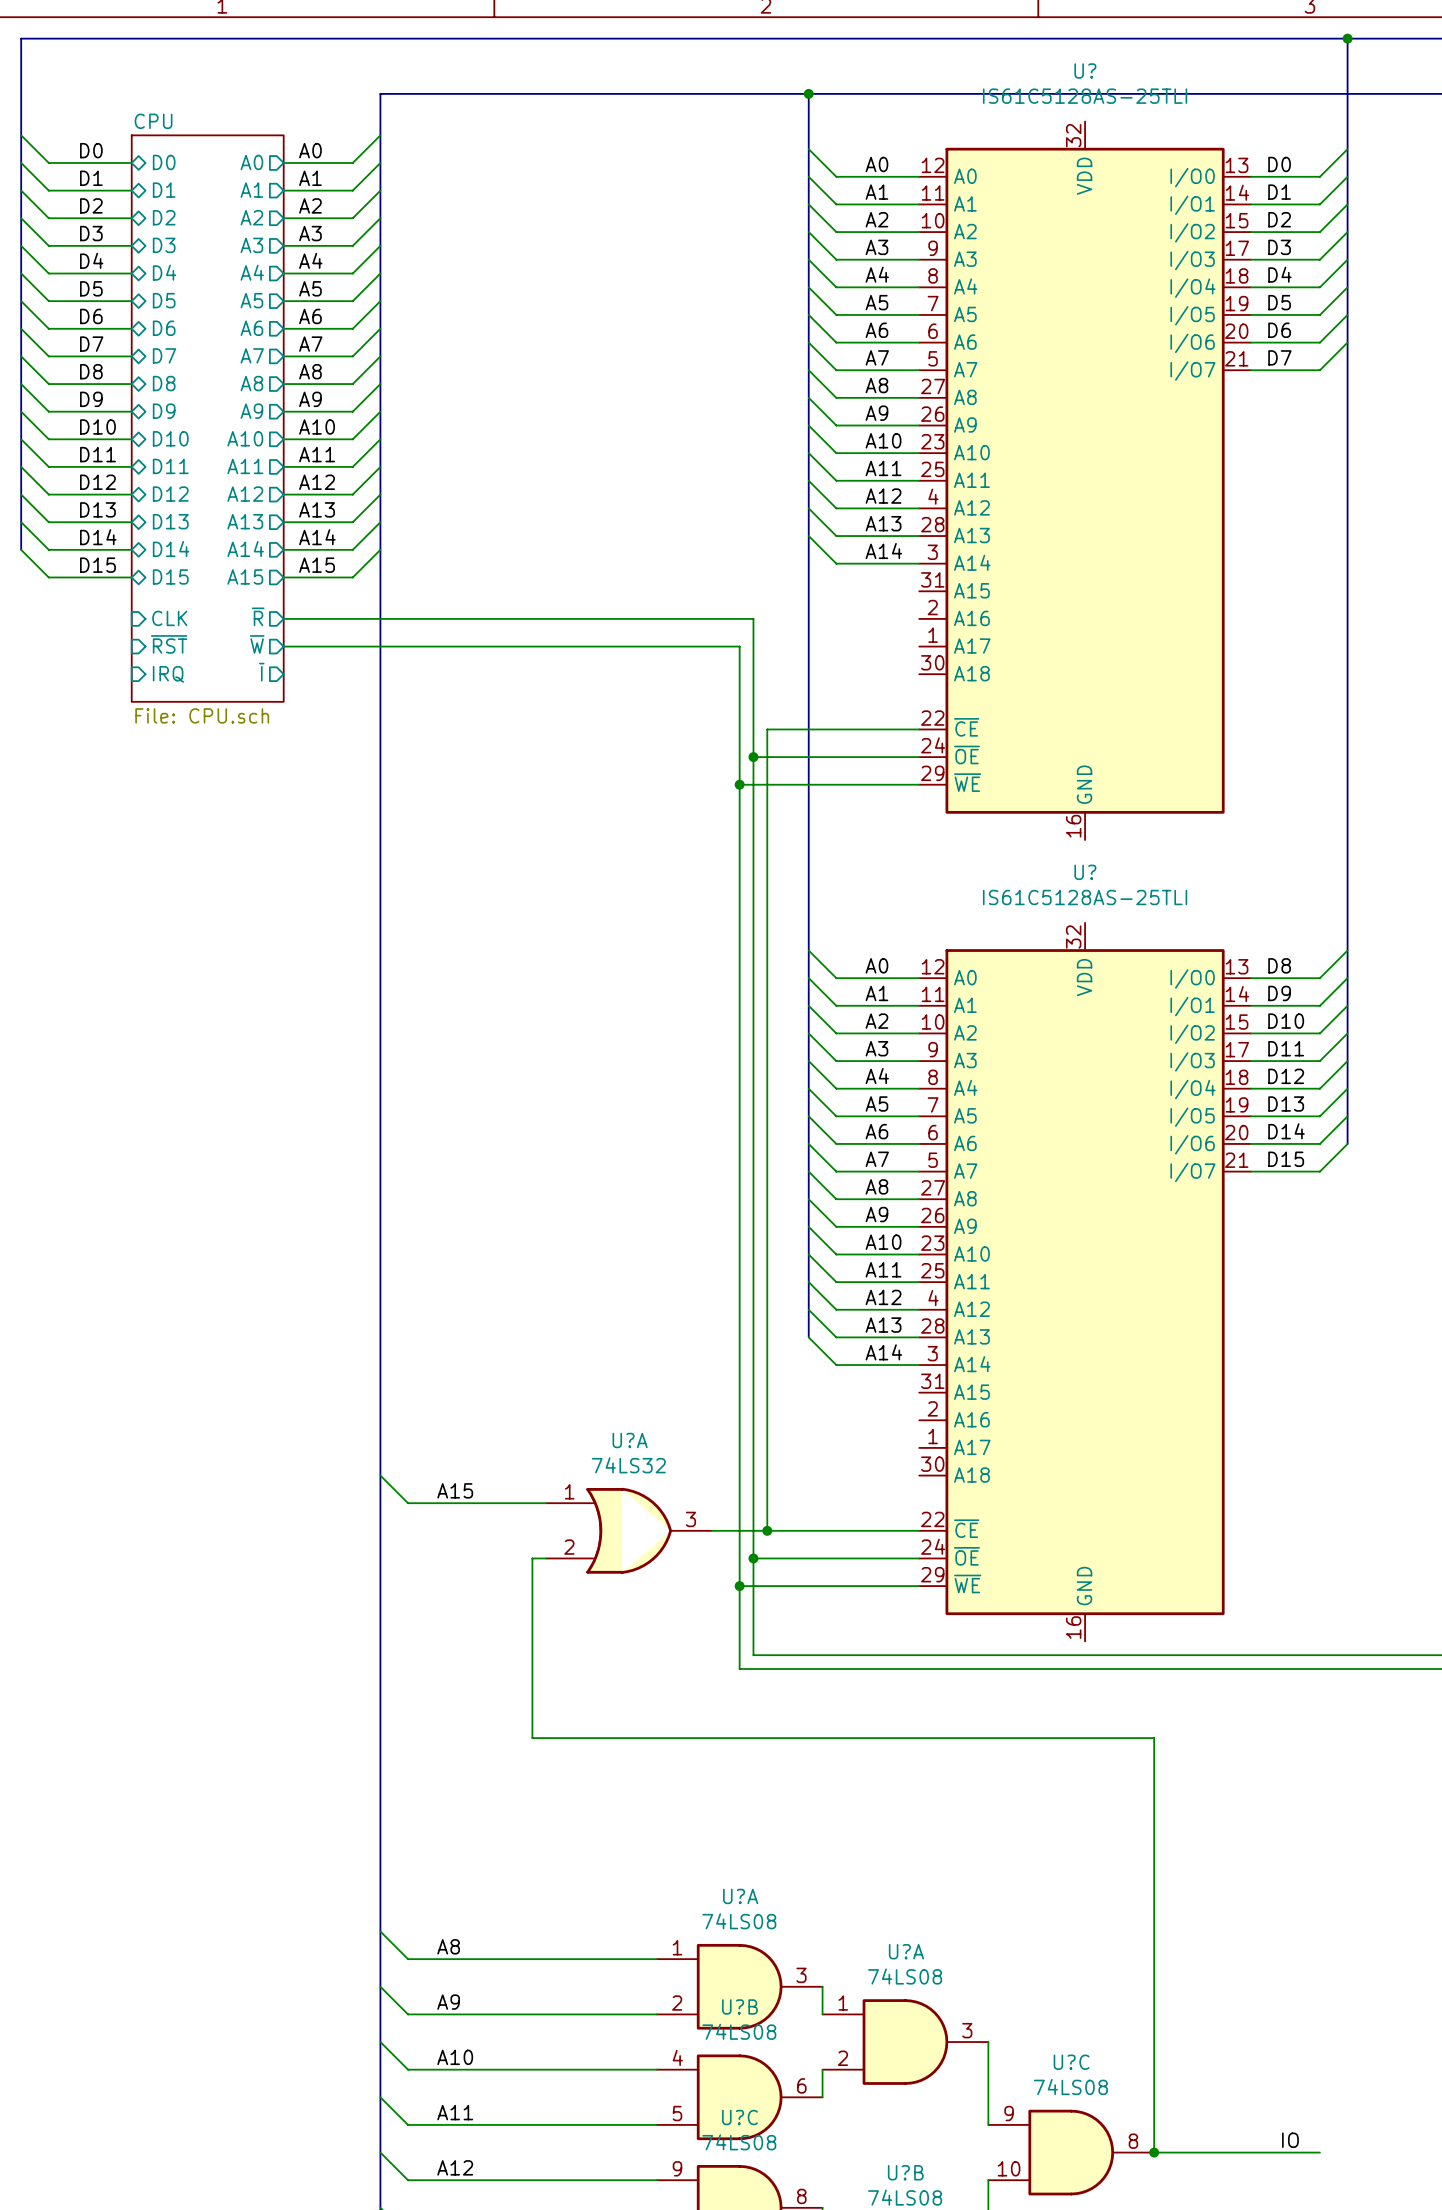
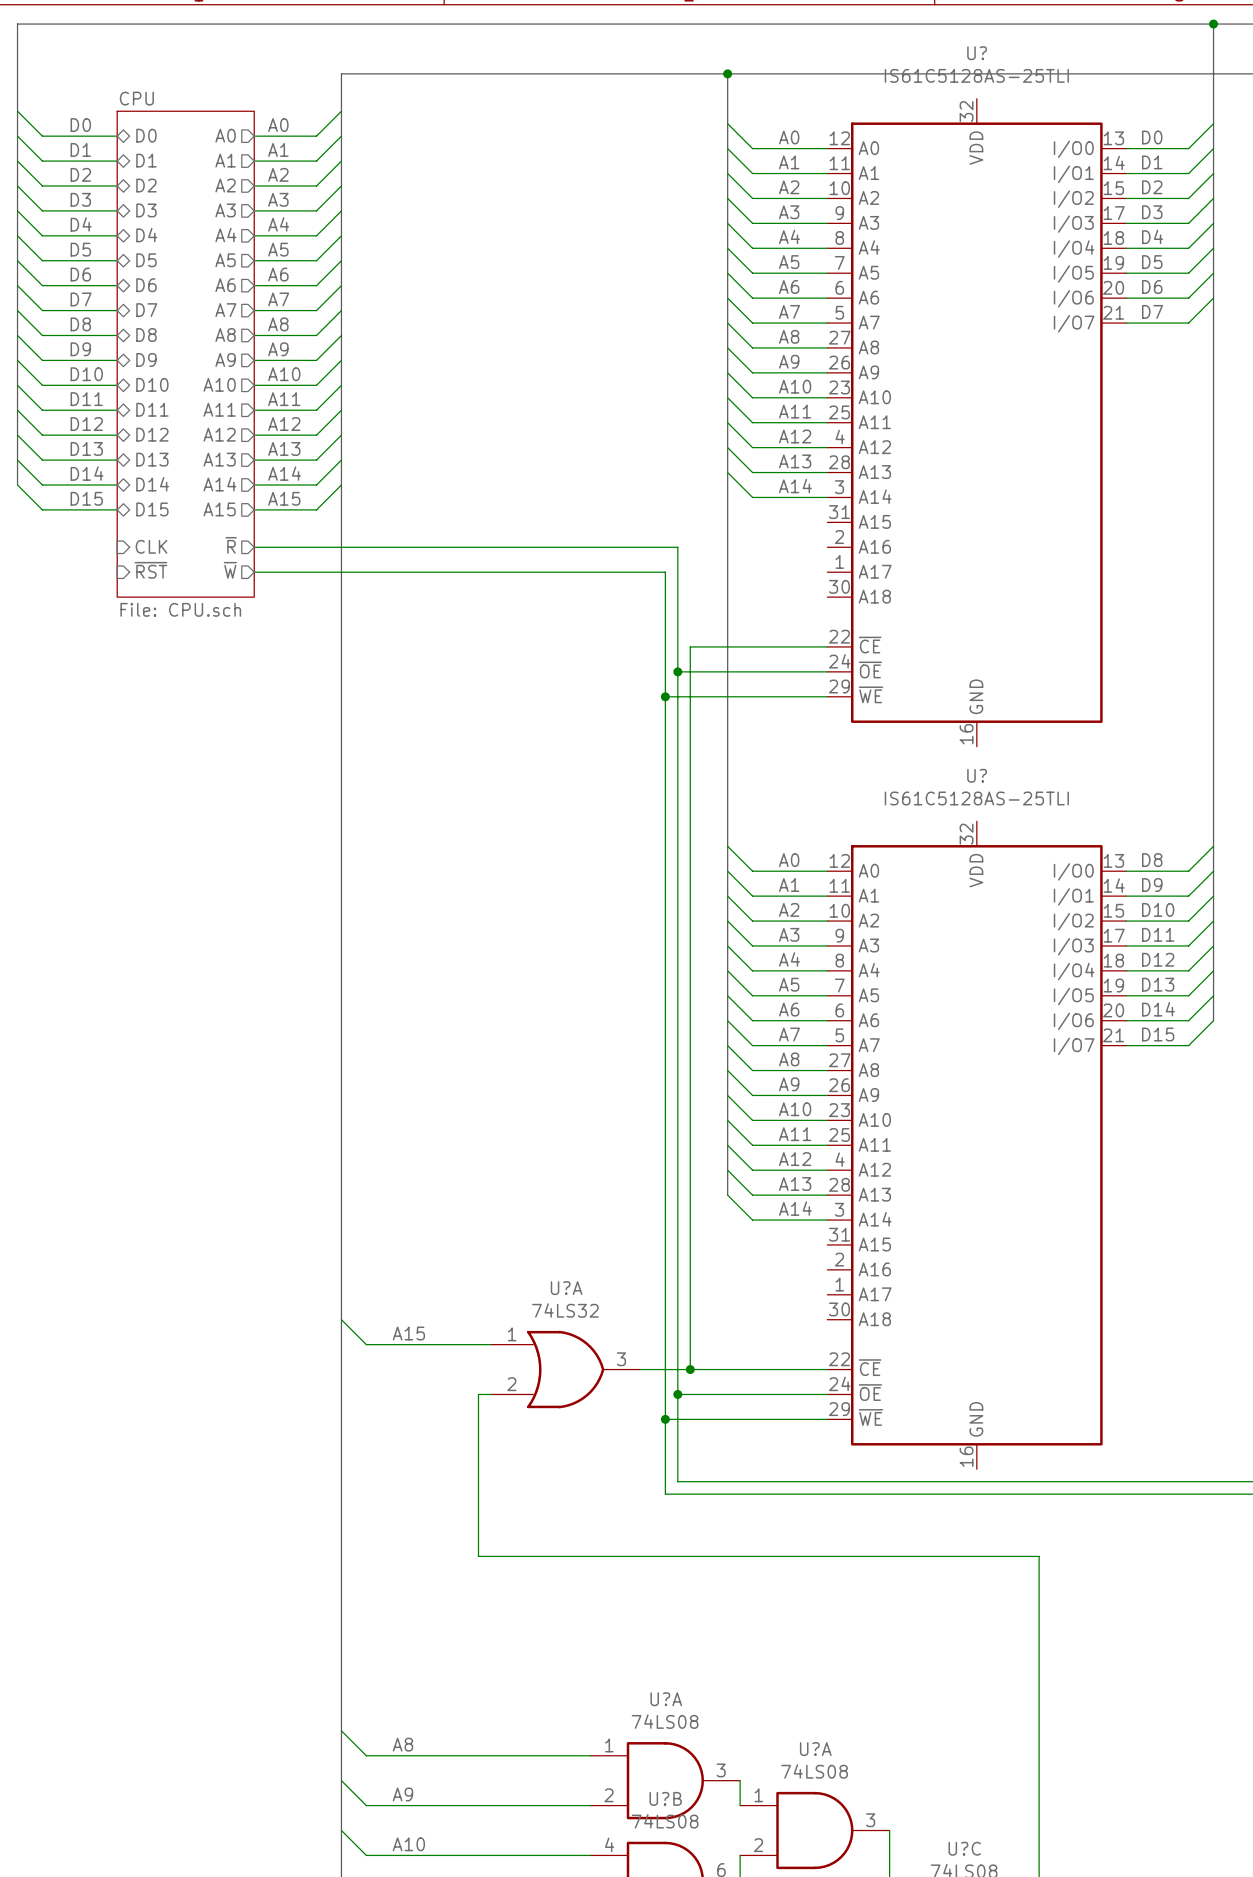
sheet CPU: none -> File: CPU.sch (185, 354)
sheet CPU: File: CPU.sch (207, 418) -> none
sheet pin: ~{I} (261, 672) -> none
sheet pin: IRQ (168, 674) -> none

